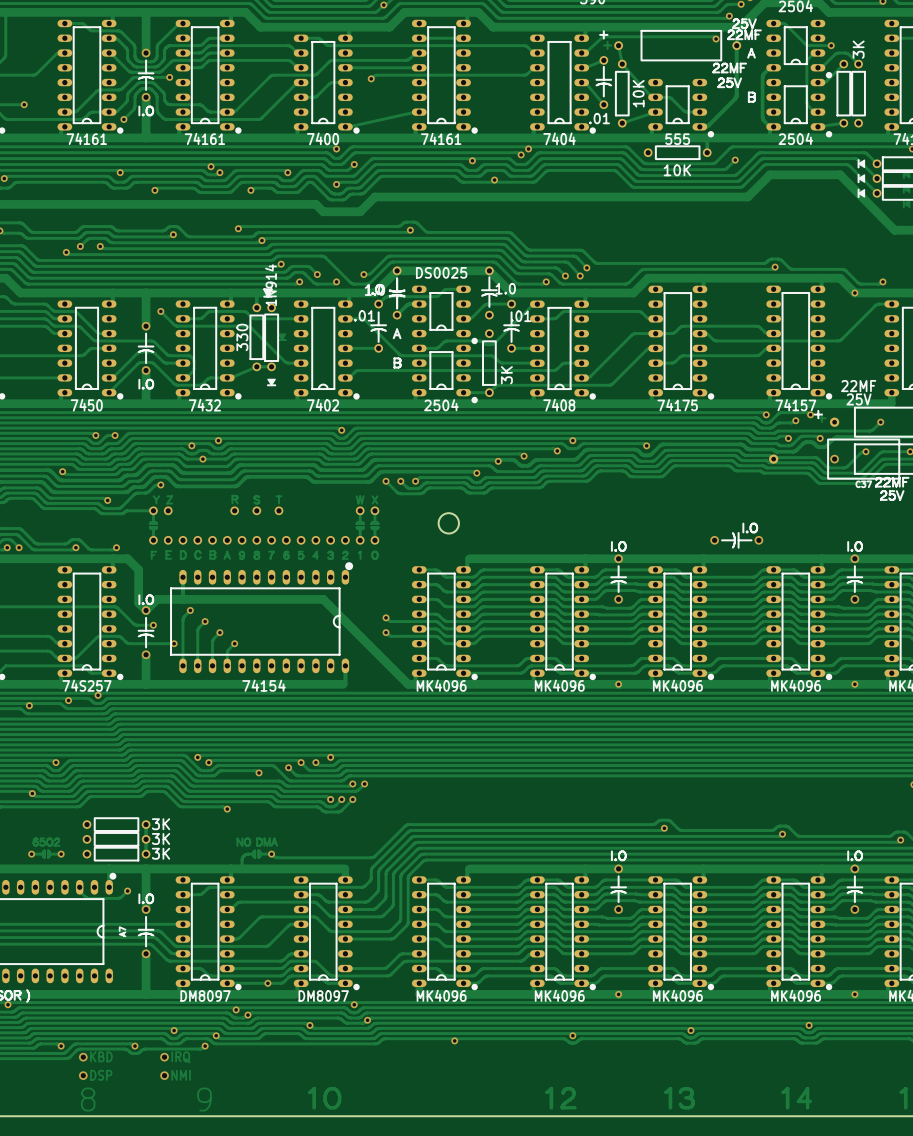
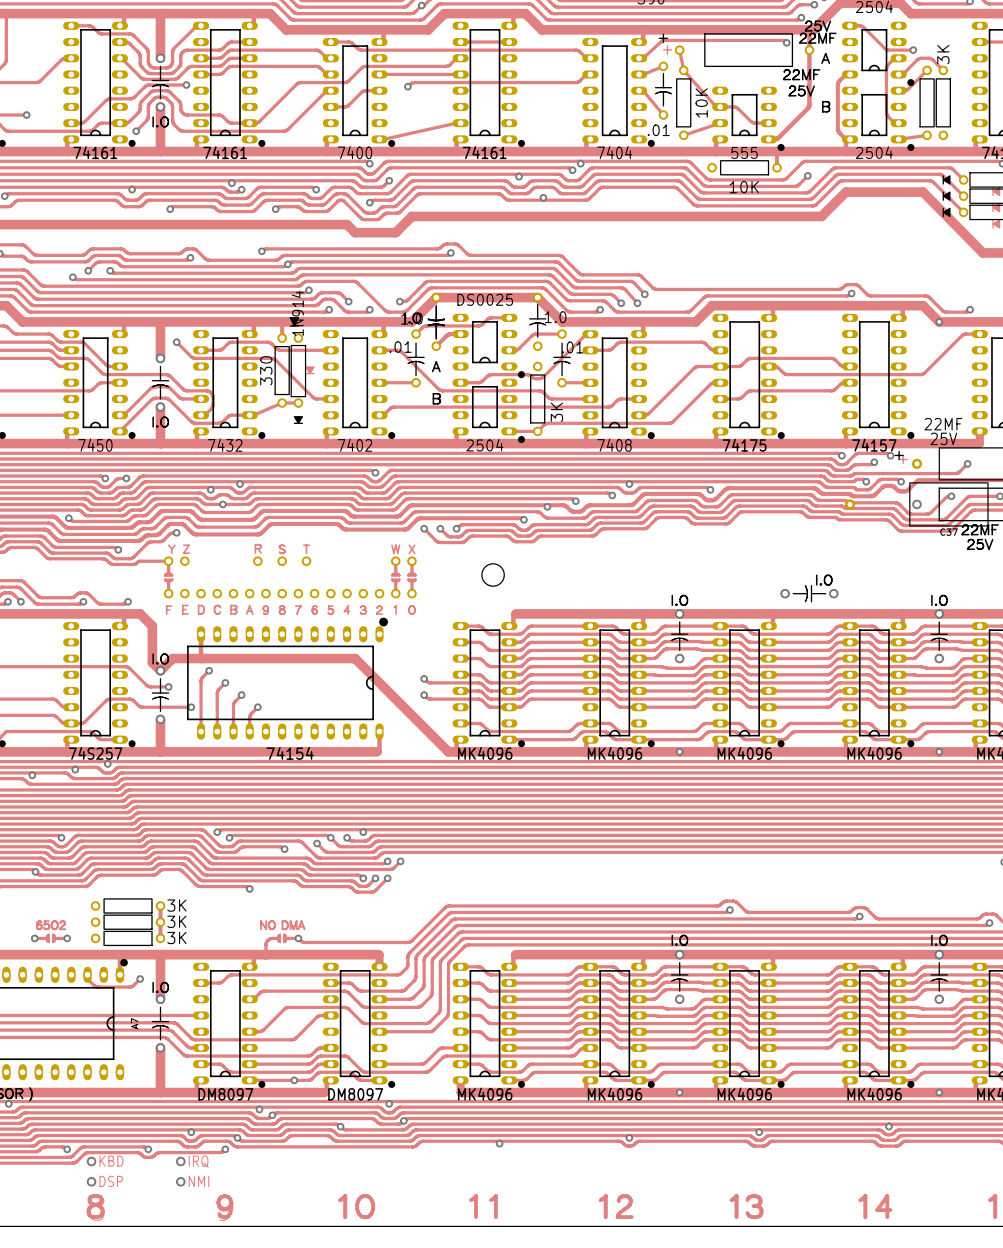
track: none -> (93, 1196) (100, 1197) (101, 1201) (100, 1203) (98, 1204) (94, 1205) (91, 1206) (88, 1213) (90, 1216) (97, 1217) (101, 1215) (102, 1210) (99, 1206) (96, 1205) (92, 1204) (90, 1203) (89, 1199) (93, 1196)
track: none -> (470, 1200) (475, 1196) (475, 1217)
track: none -> (490, 1200) (495, 1196) (495, 1217)
track: none -> (231, 1203) (228, 1208) (224, 1209) (219, 1206) (218, 1202) (221, 1197) (225, 1196) (230, 1199) (231, 1203)
track: none -> (231, 1203) (228, 1216) (223, 1217) (219, 1214)

